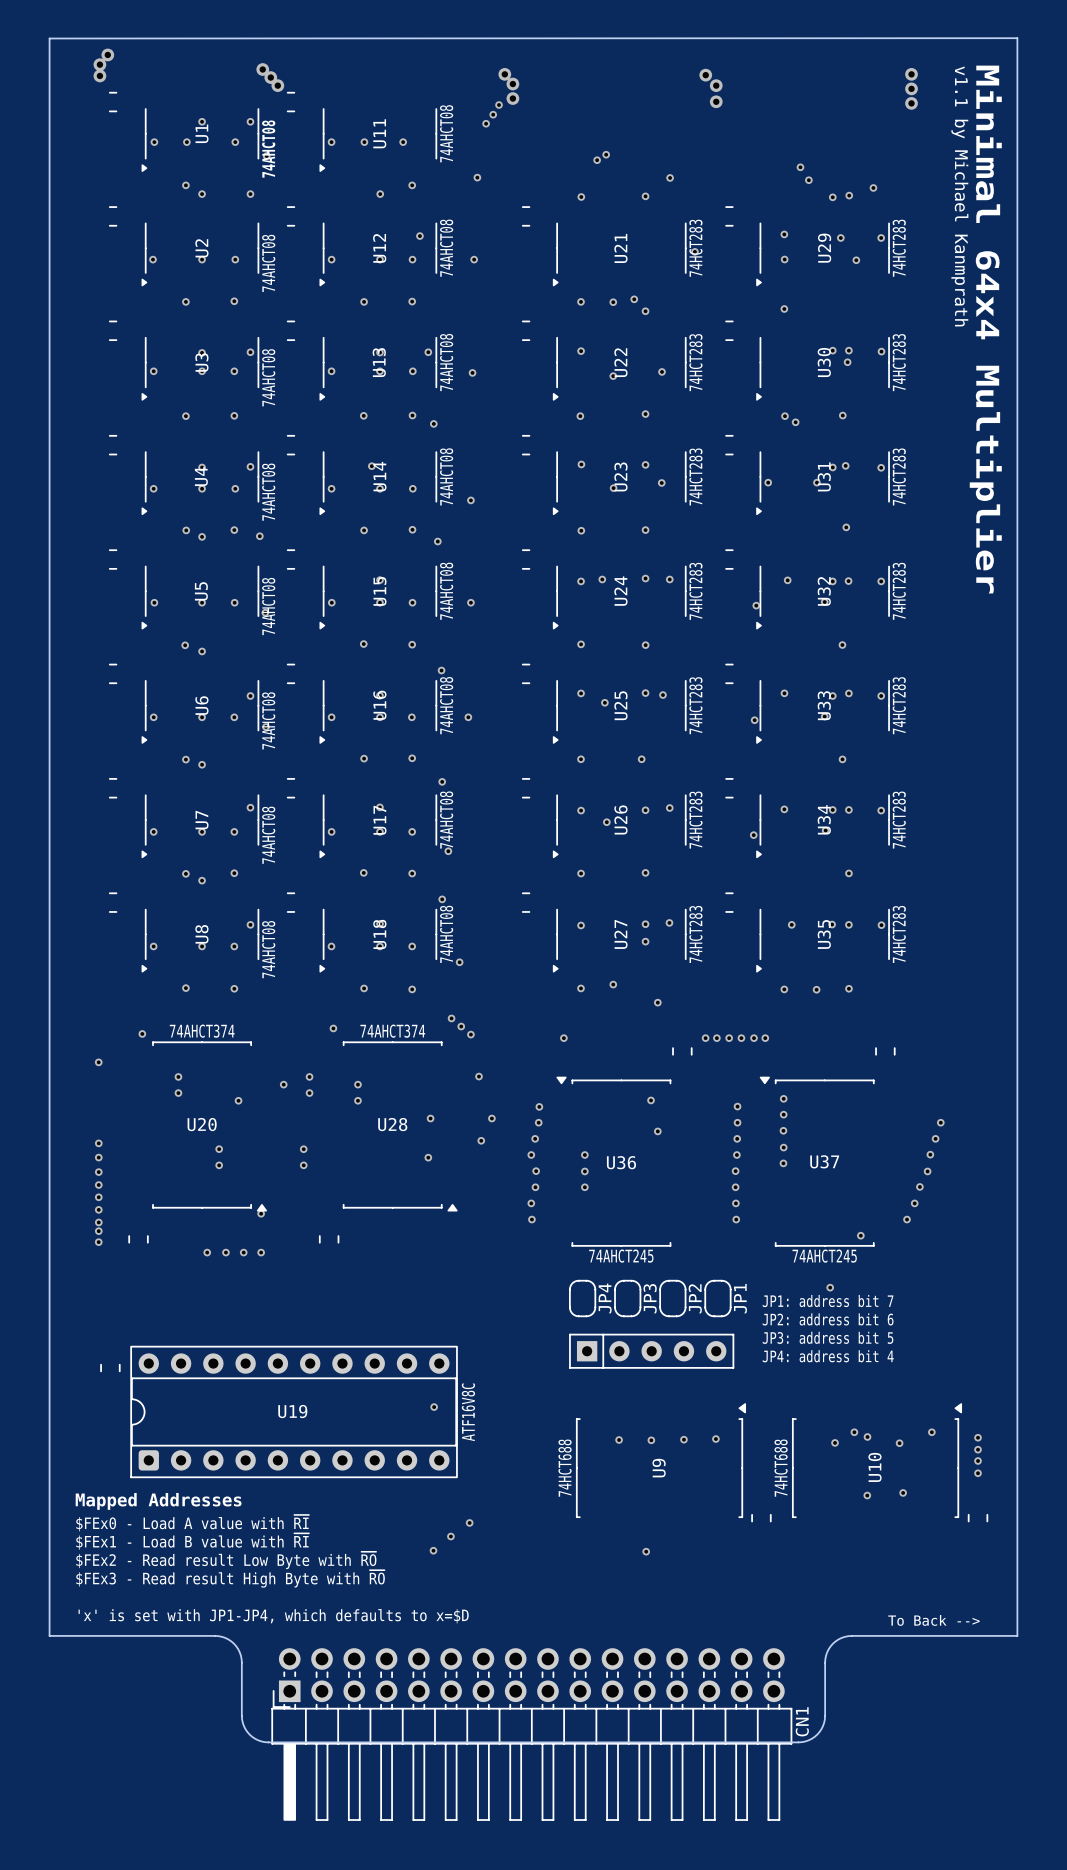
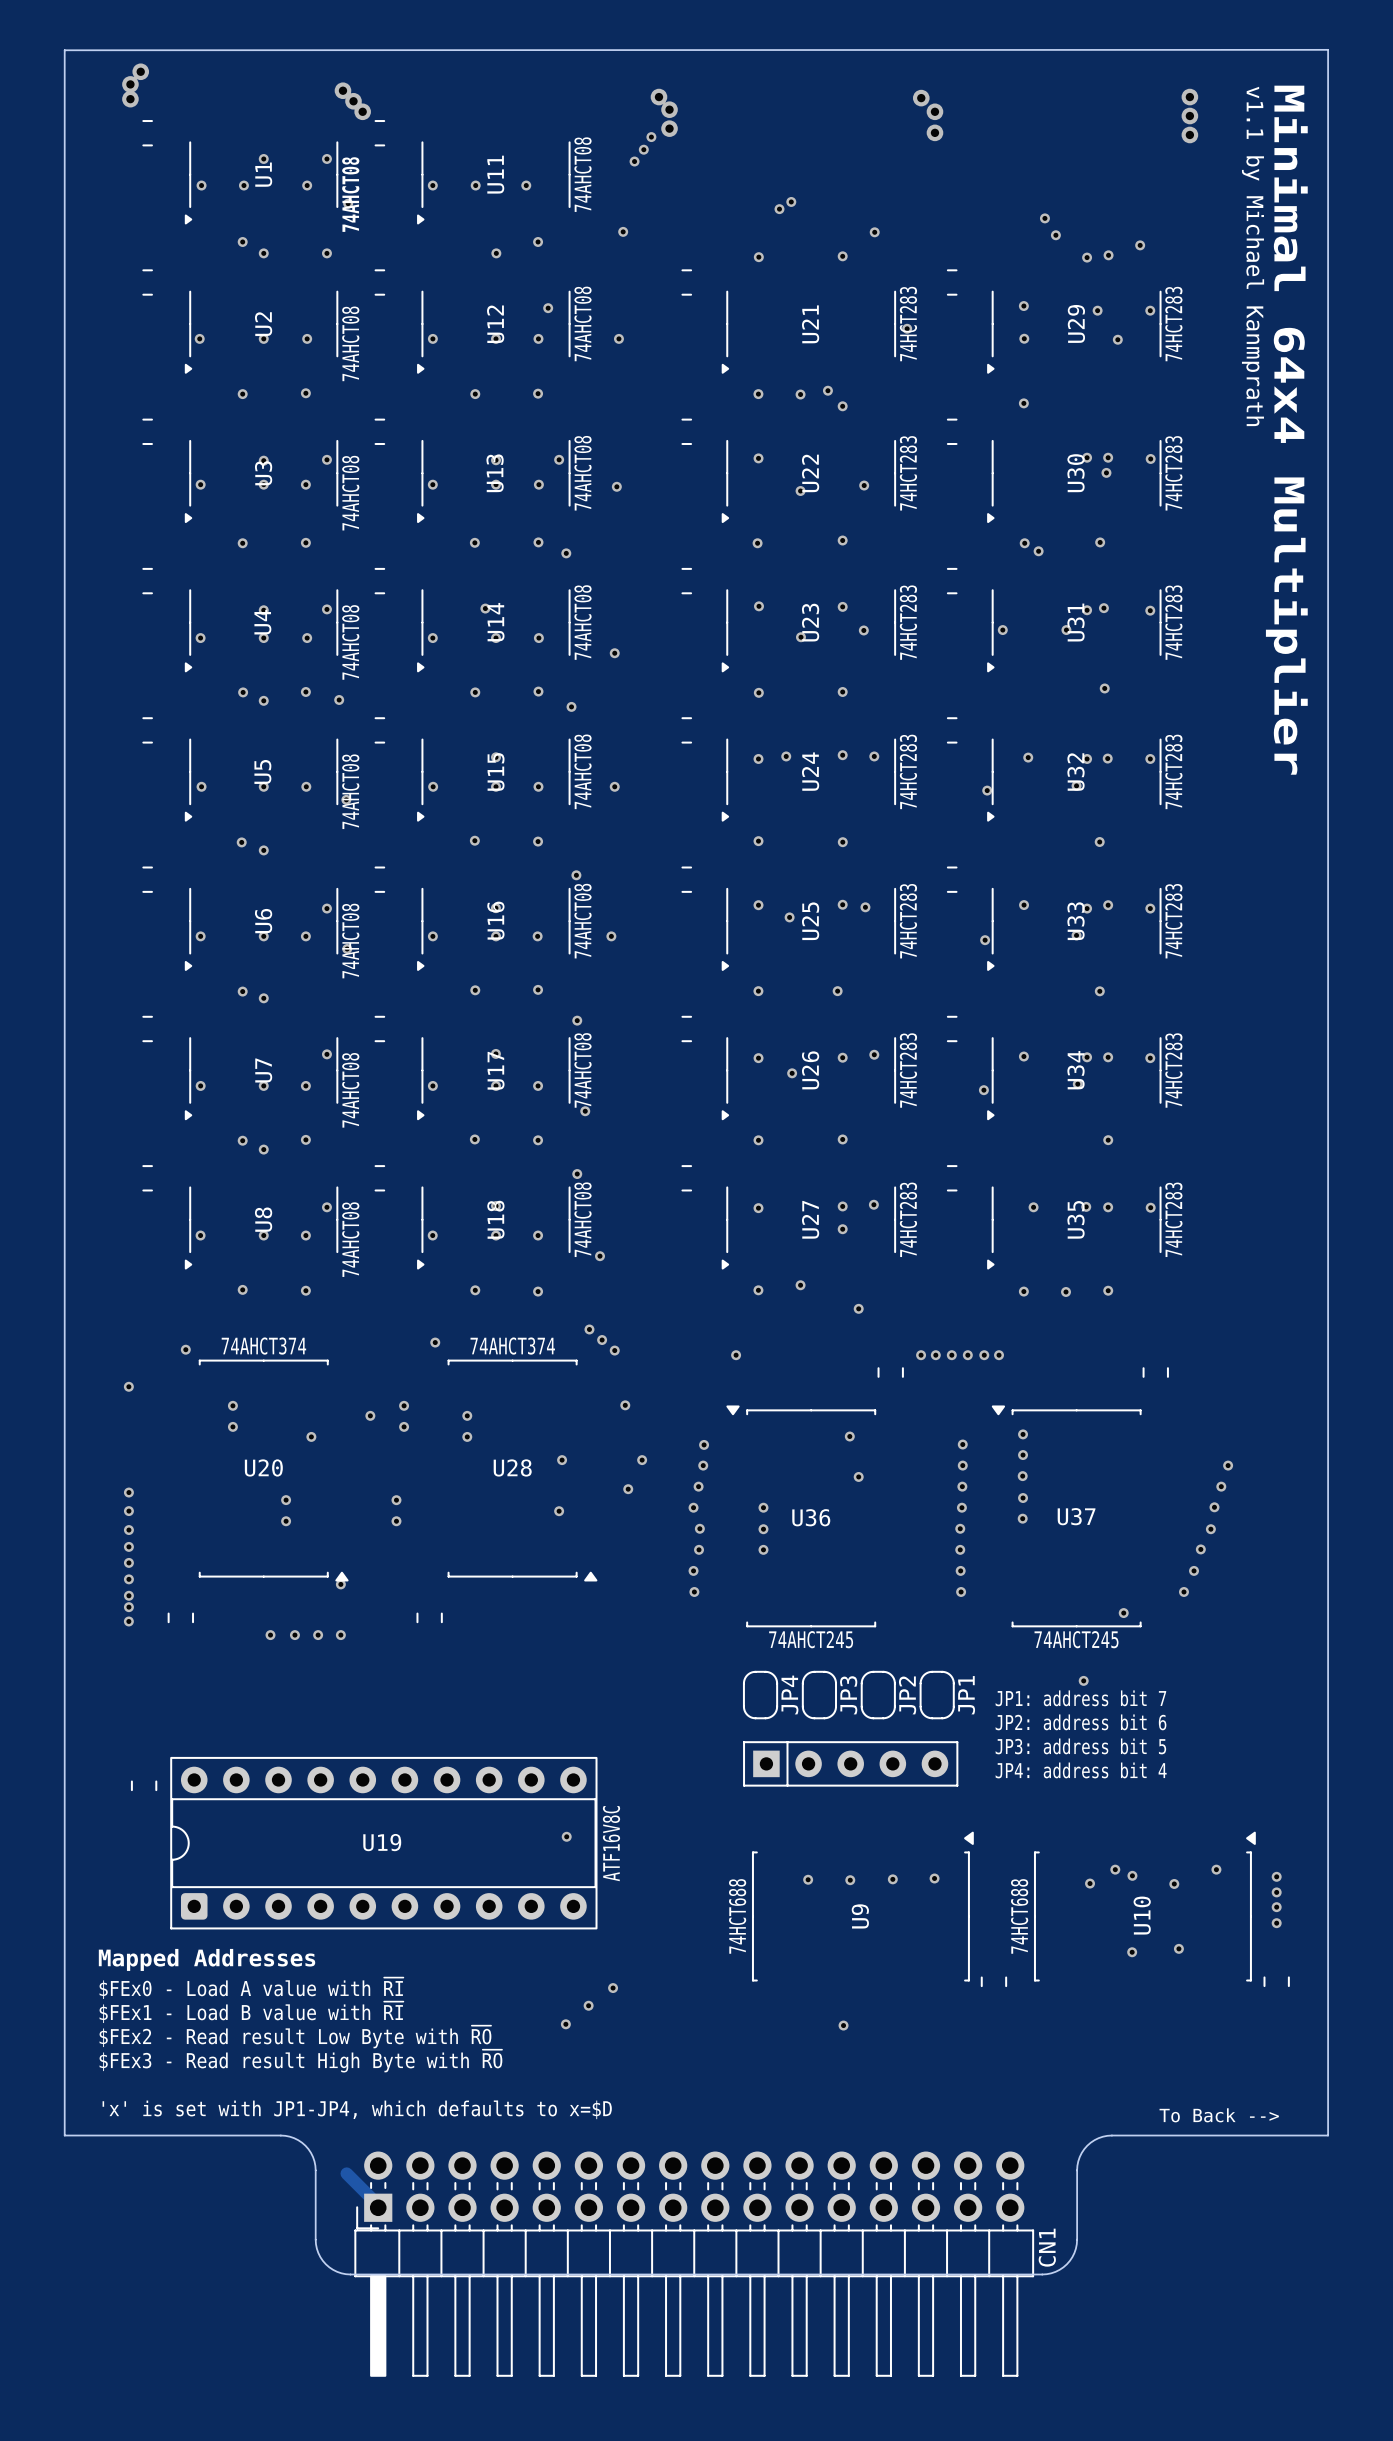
track: none -> (346, 2173) (378, 2205) (378, 2207)

